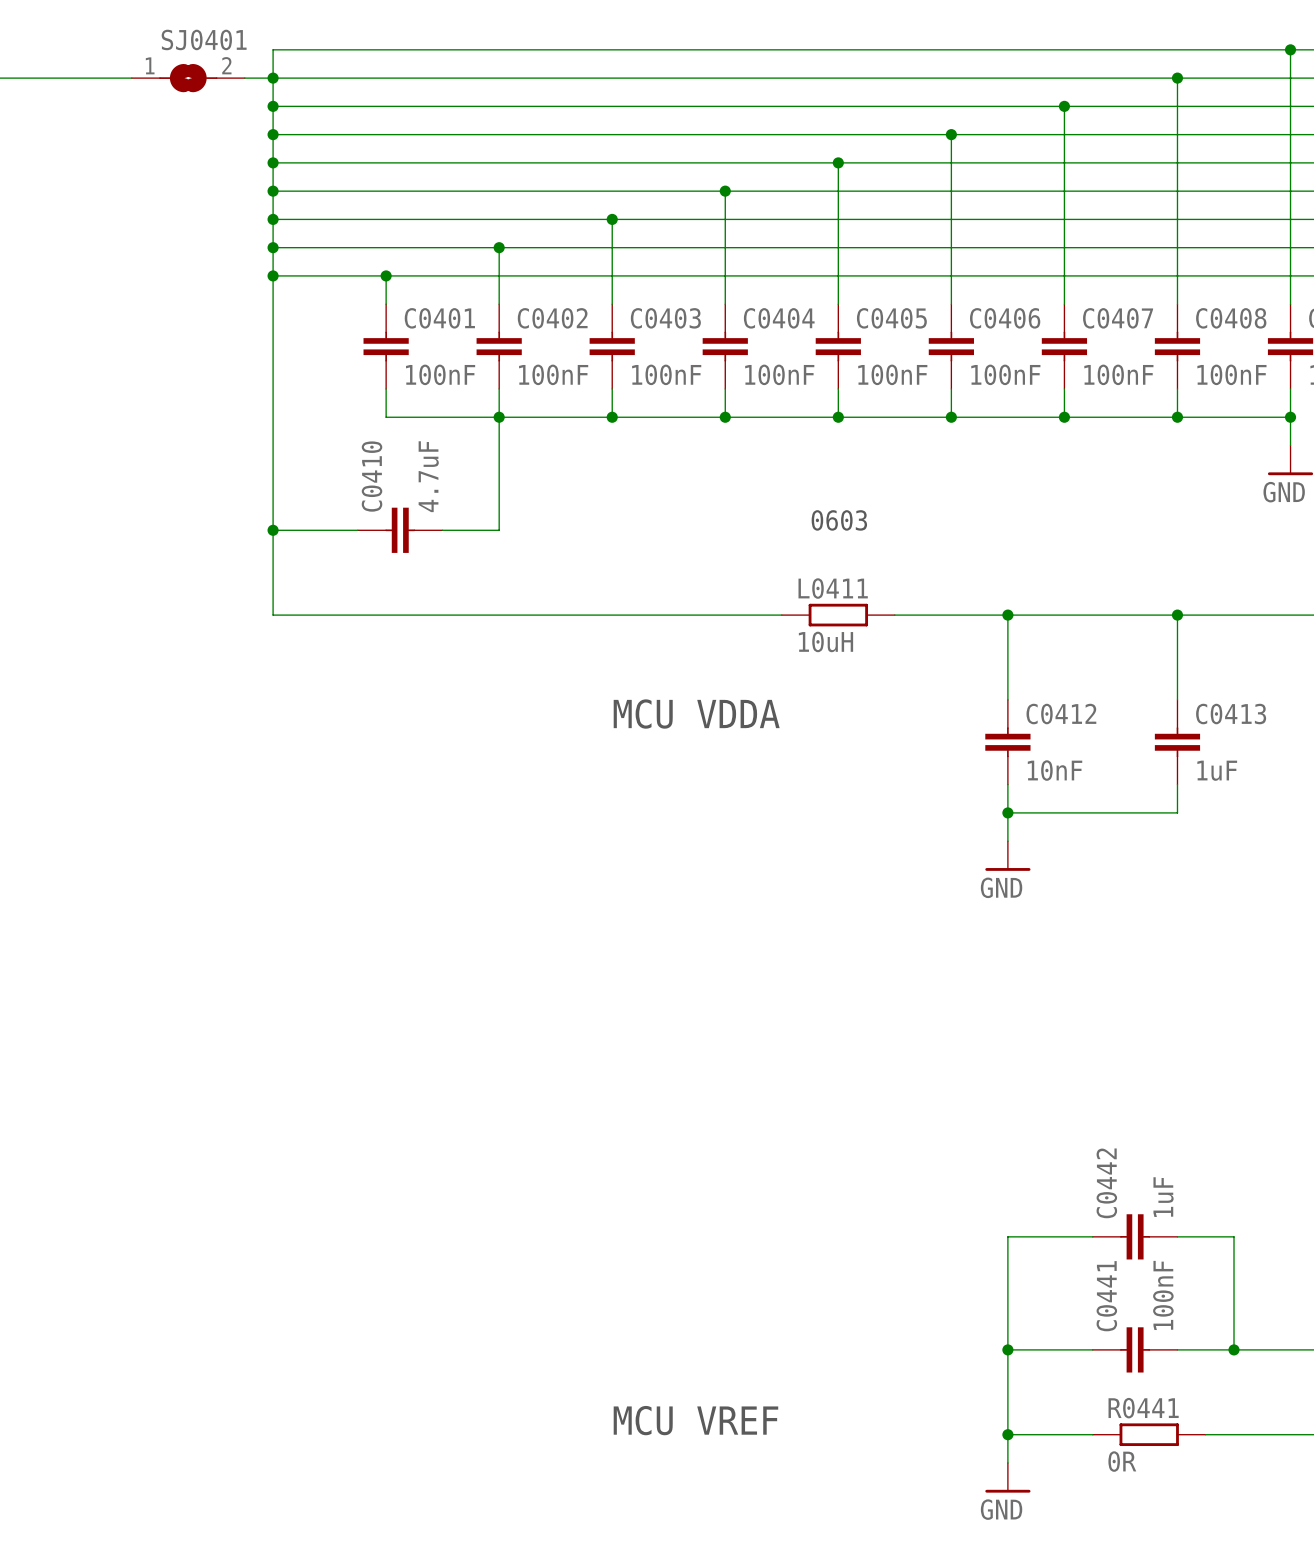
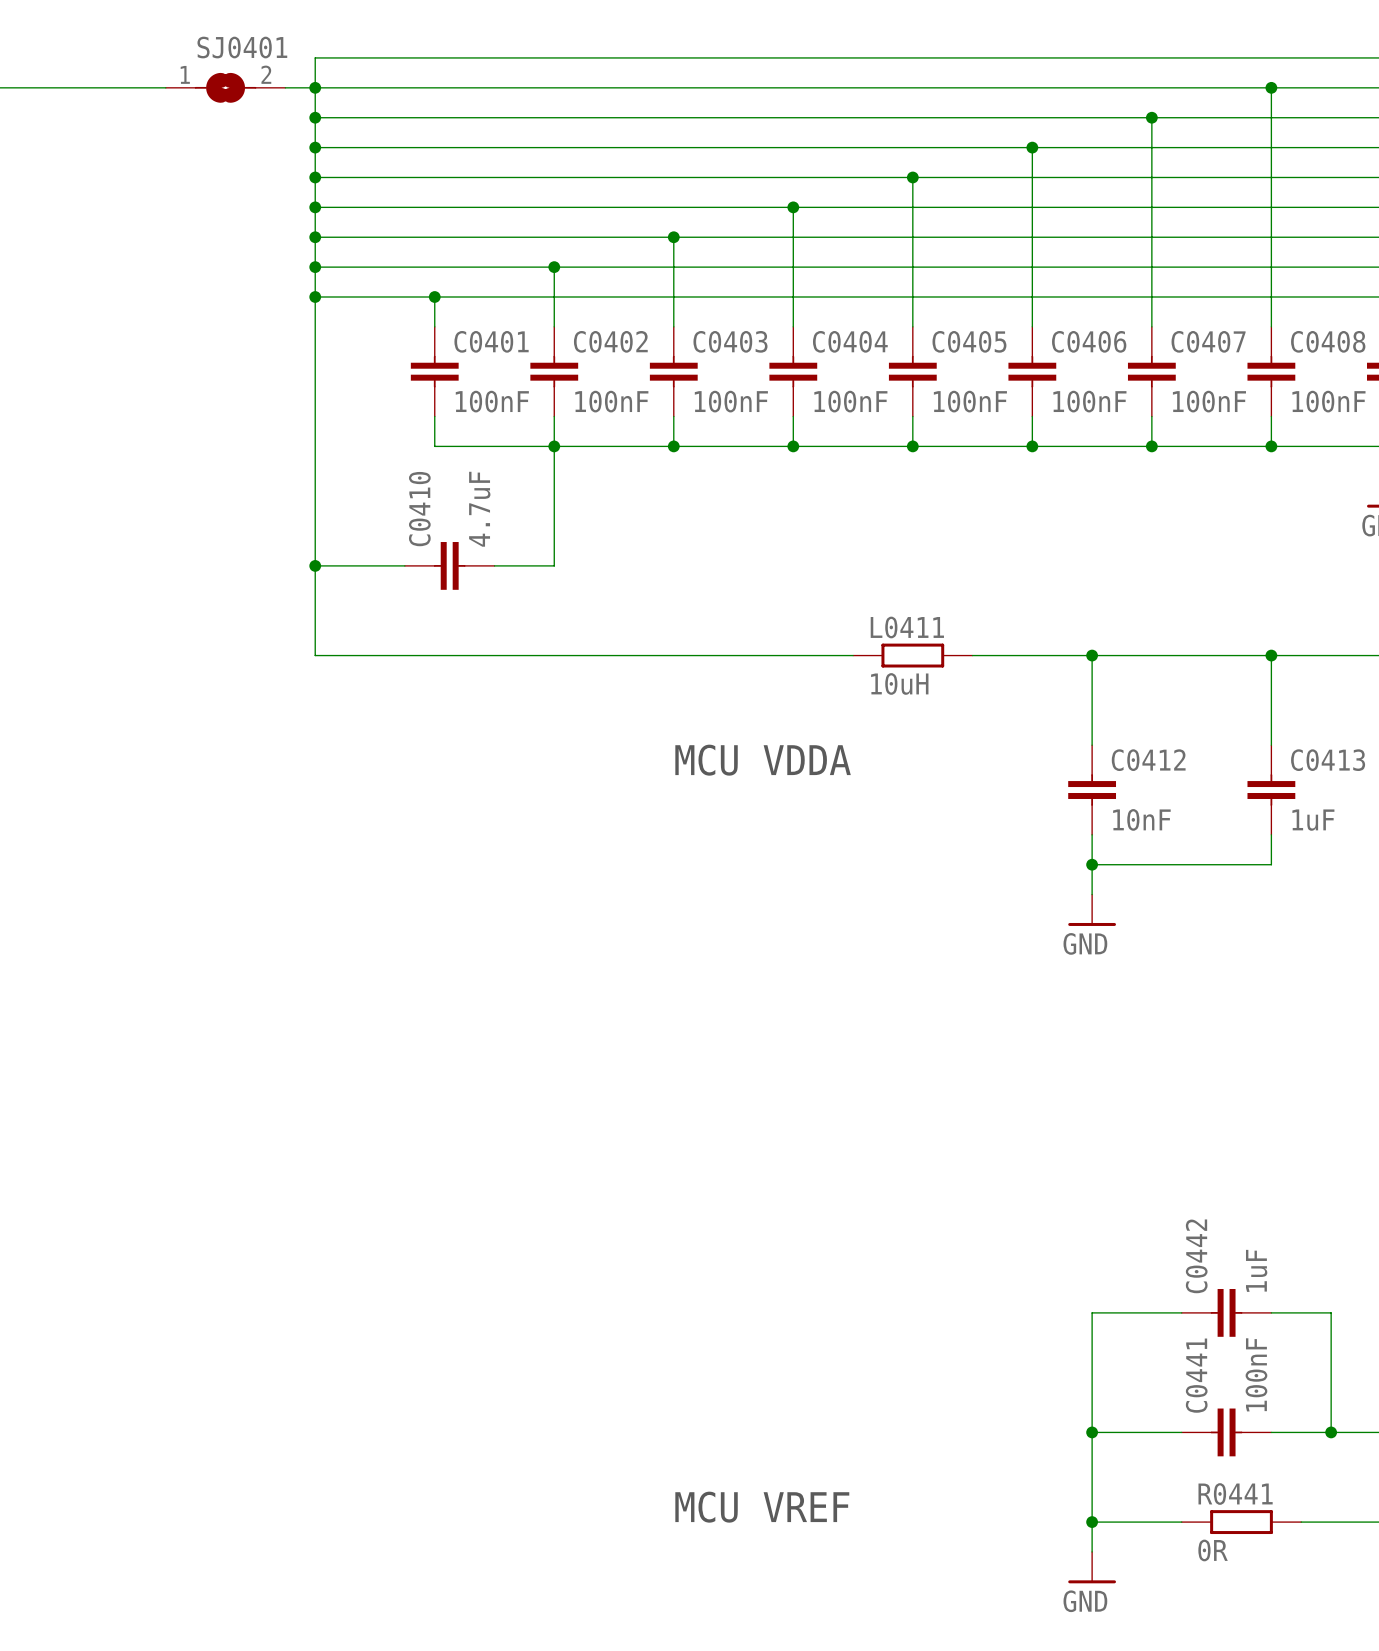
text: 0603 (839, 520) -> none

